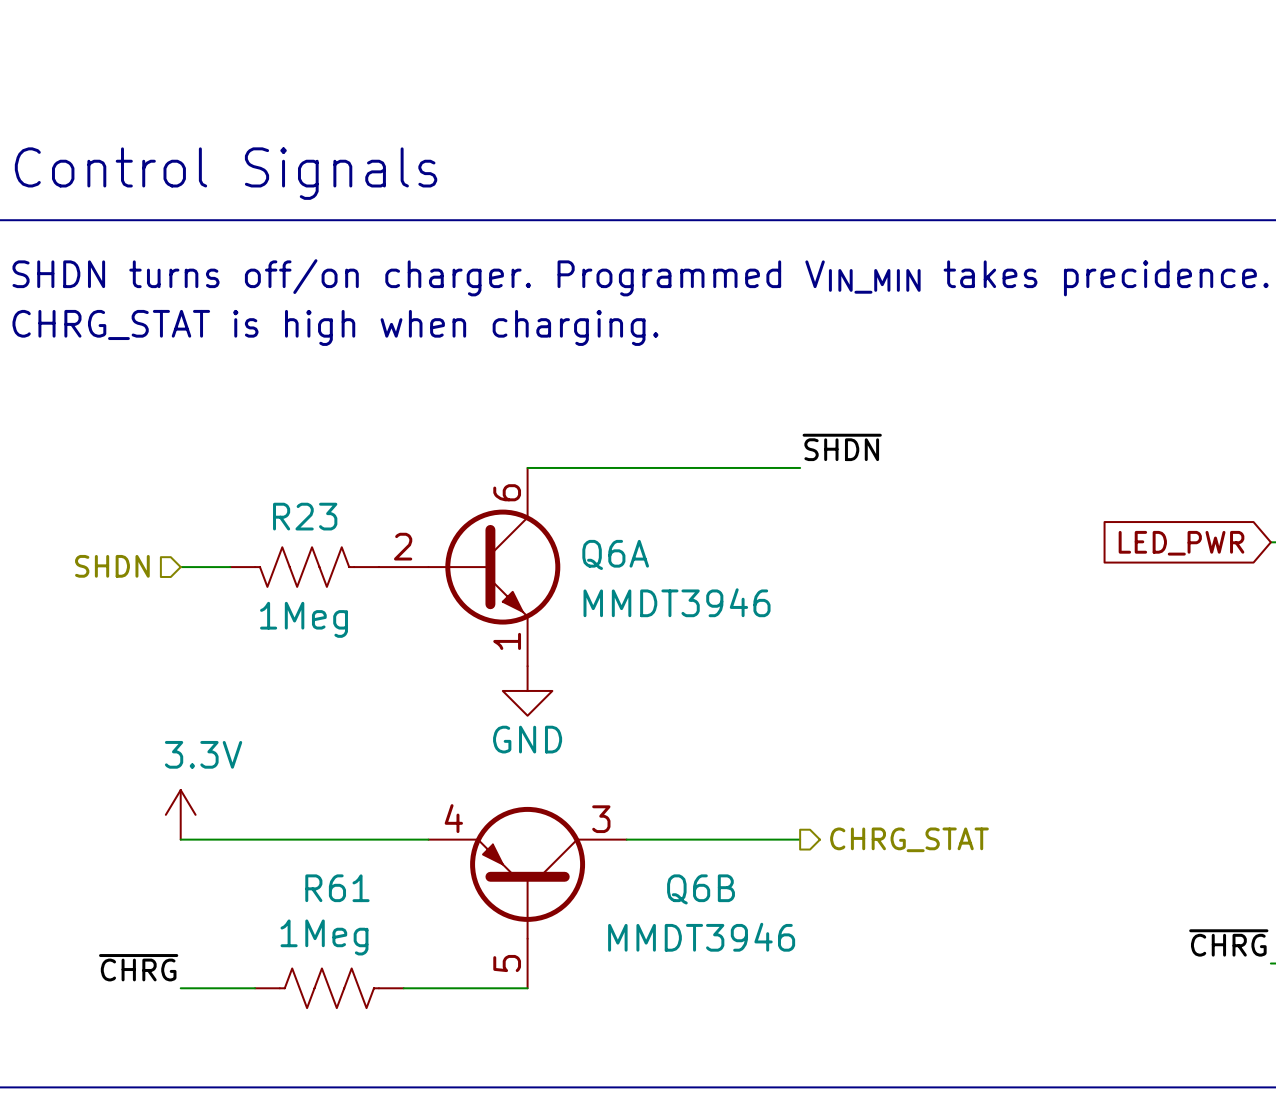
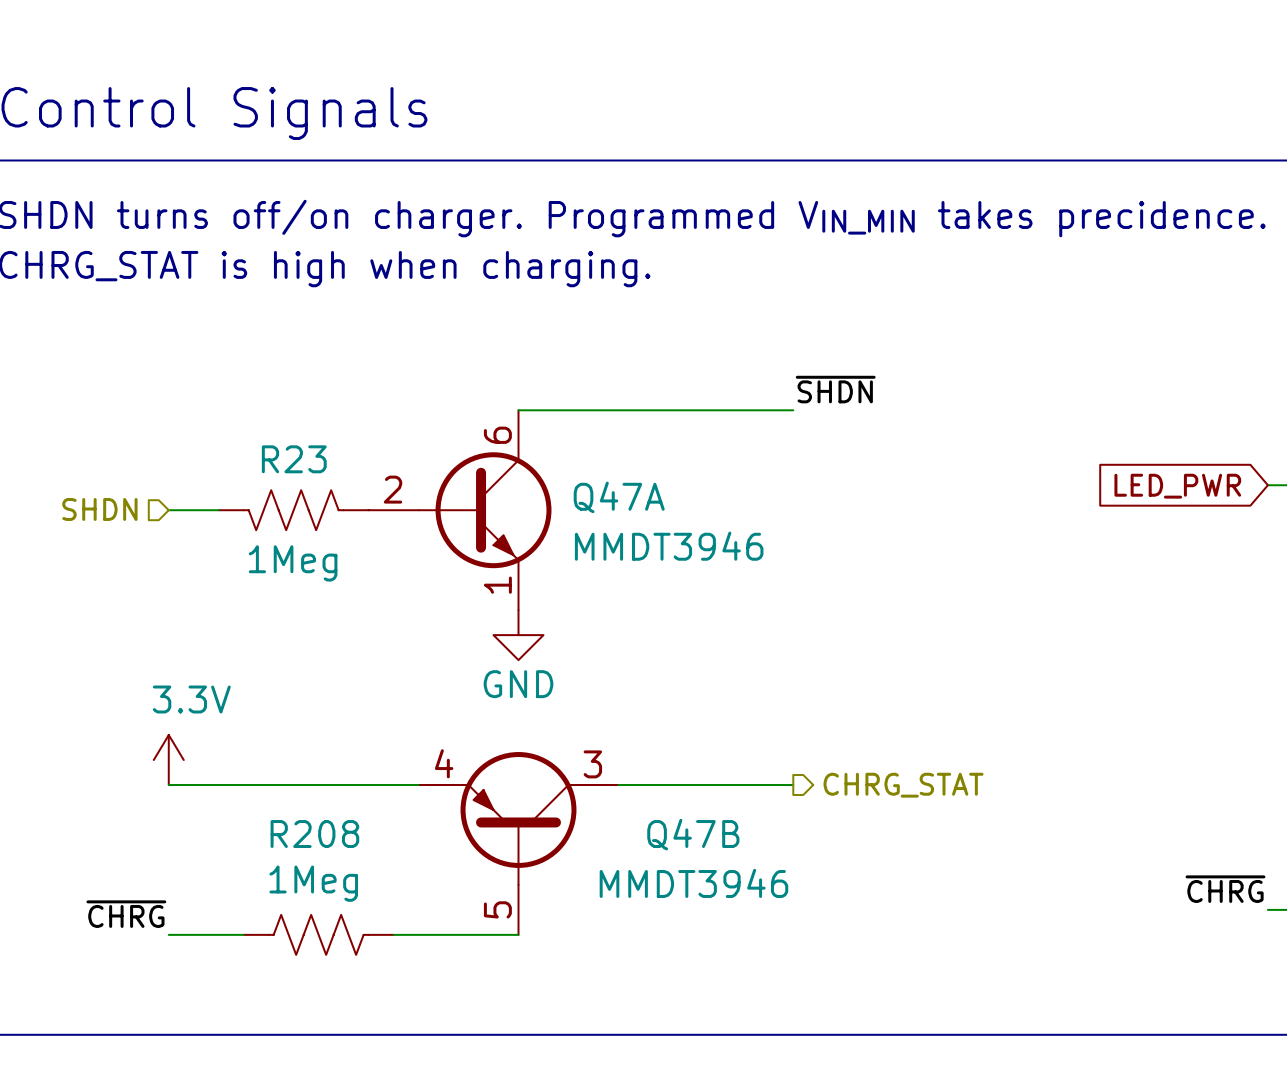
Q6A name: Q6A (615, 554) -> Q47A (619, 497)
R61 name: R61 (337, 888) -> R208 (314, 834)
Q6B name: Q6B (701, 889) -> Q47B (693, 834)

